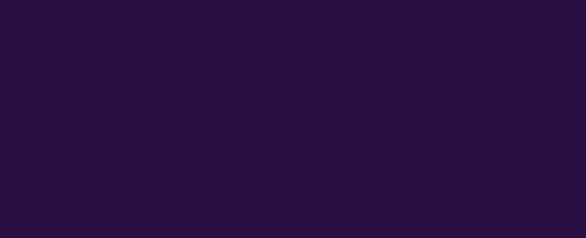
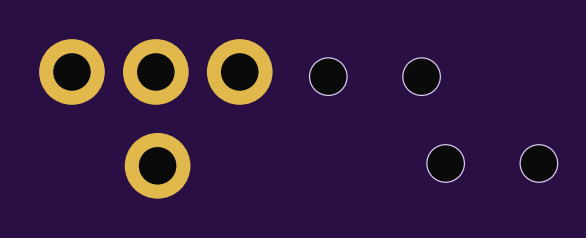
part: none -> (71, 71)
part: none -> (155, 71)
part: none -> (239, 71)
part: none -> (328, 76)
part: none -> (421, 76)
part: none -> (445, 163)
part: none -> (538, 163)
part: none -> (157, 165)

